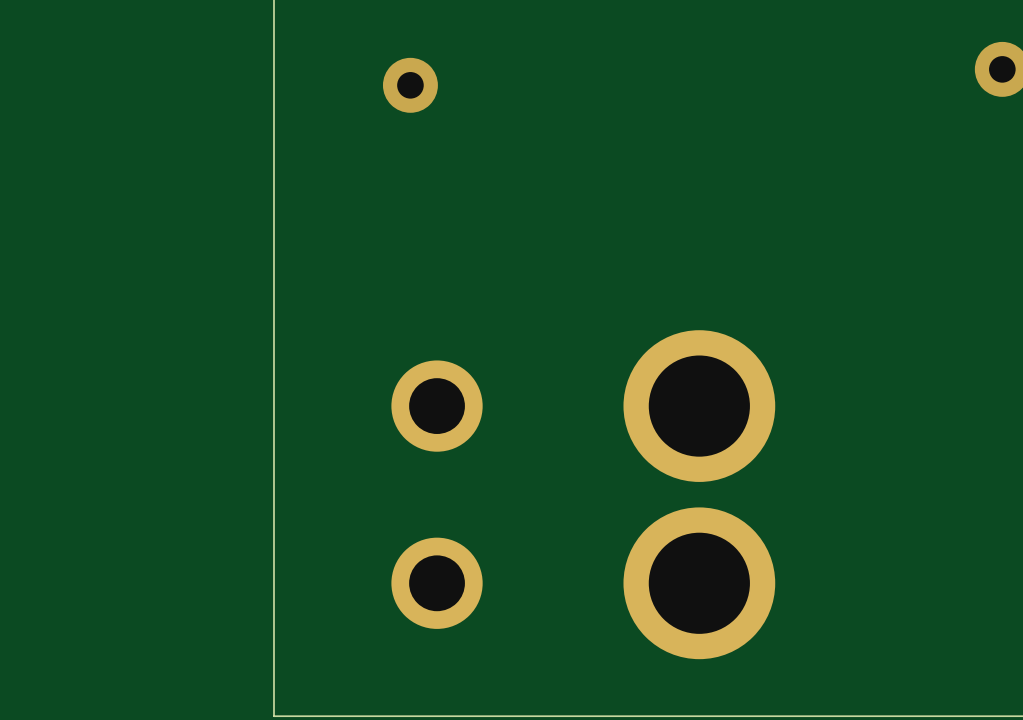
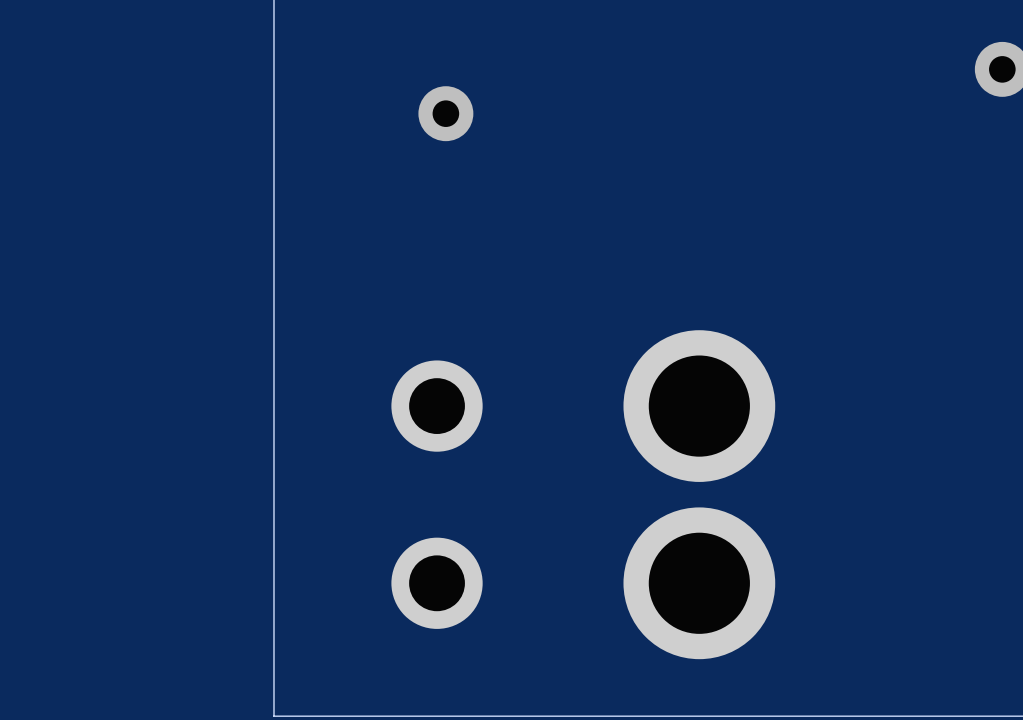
via position: (410, 85) -> (445, 113)

